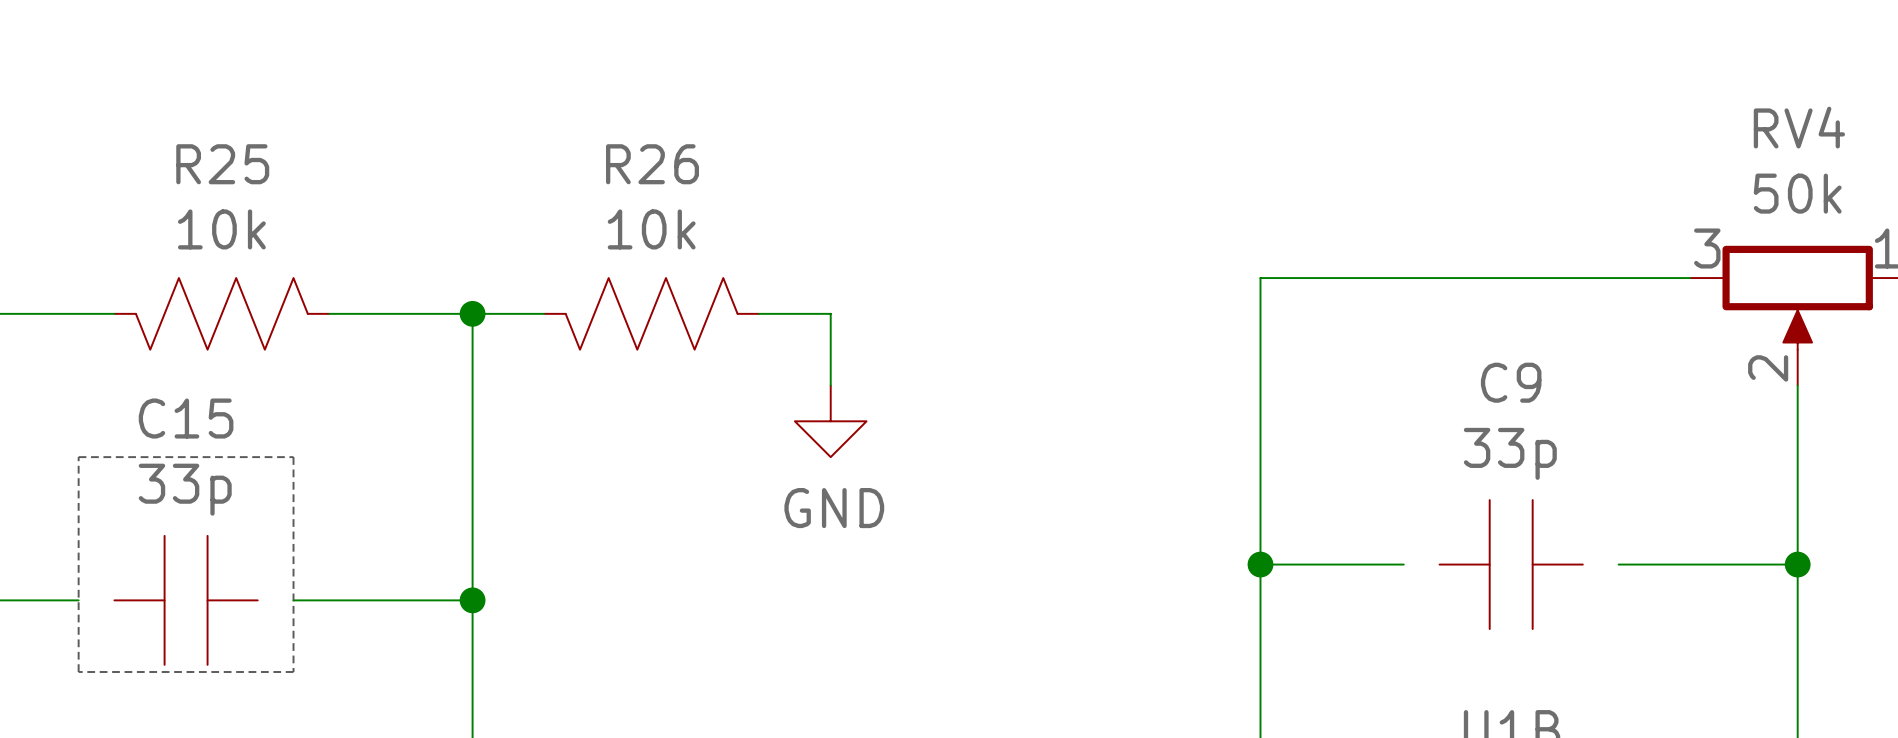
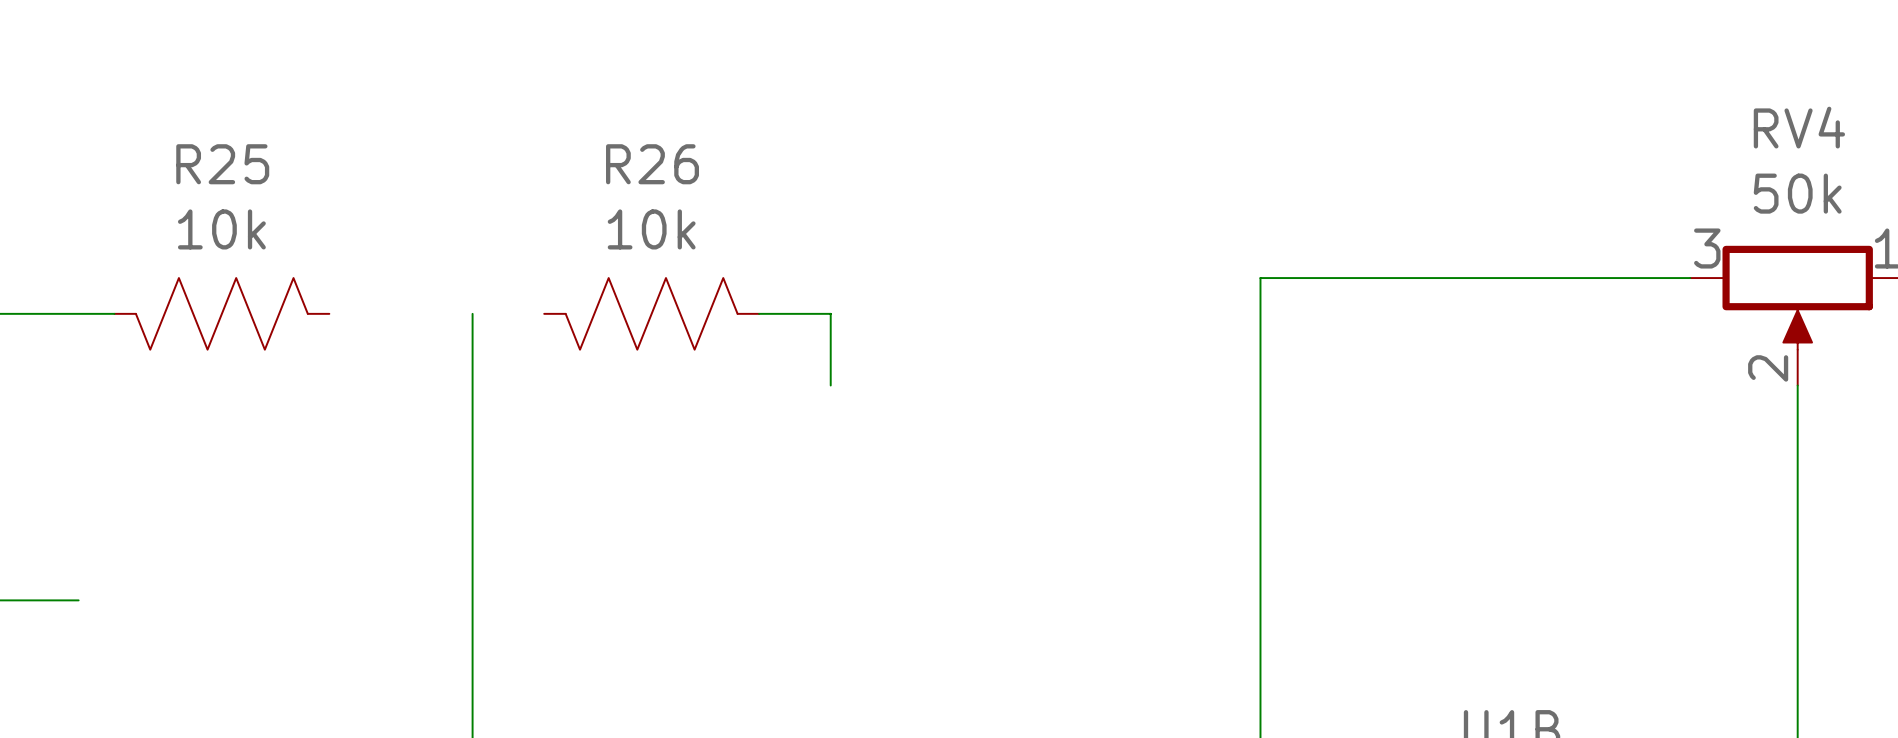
wire: (329, 313) (544, 313) -> none
junction: (472, 313) -> none
power symbol: GND (830, 421) -> none
line: (78, 457) (293, 457) (293, 672) (78, 672) (78, 457) -> none
wire: (1260, 564) (1403, 564) -> none
junction: (1260, 564) -> none
C9: 33p (1511, 564) -> none
wire: (1618, 564) (1797, 564) -> none
junction: (1797, 564) -> none
C15: 33p (186, 600) -> none
wire: (293, 600) (472, 600) -> none
junction: (472, 600) -> none

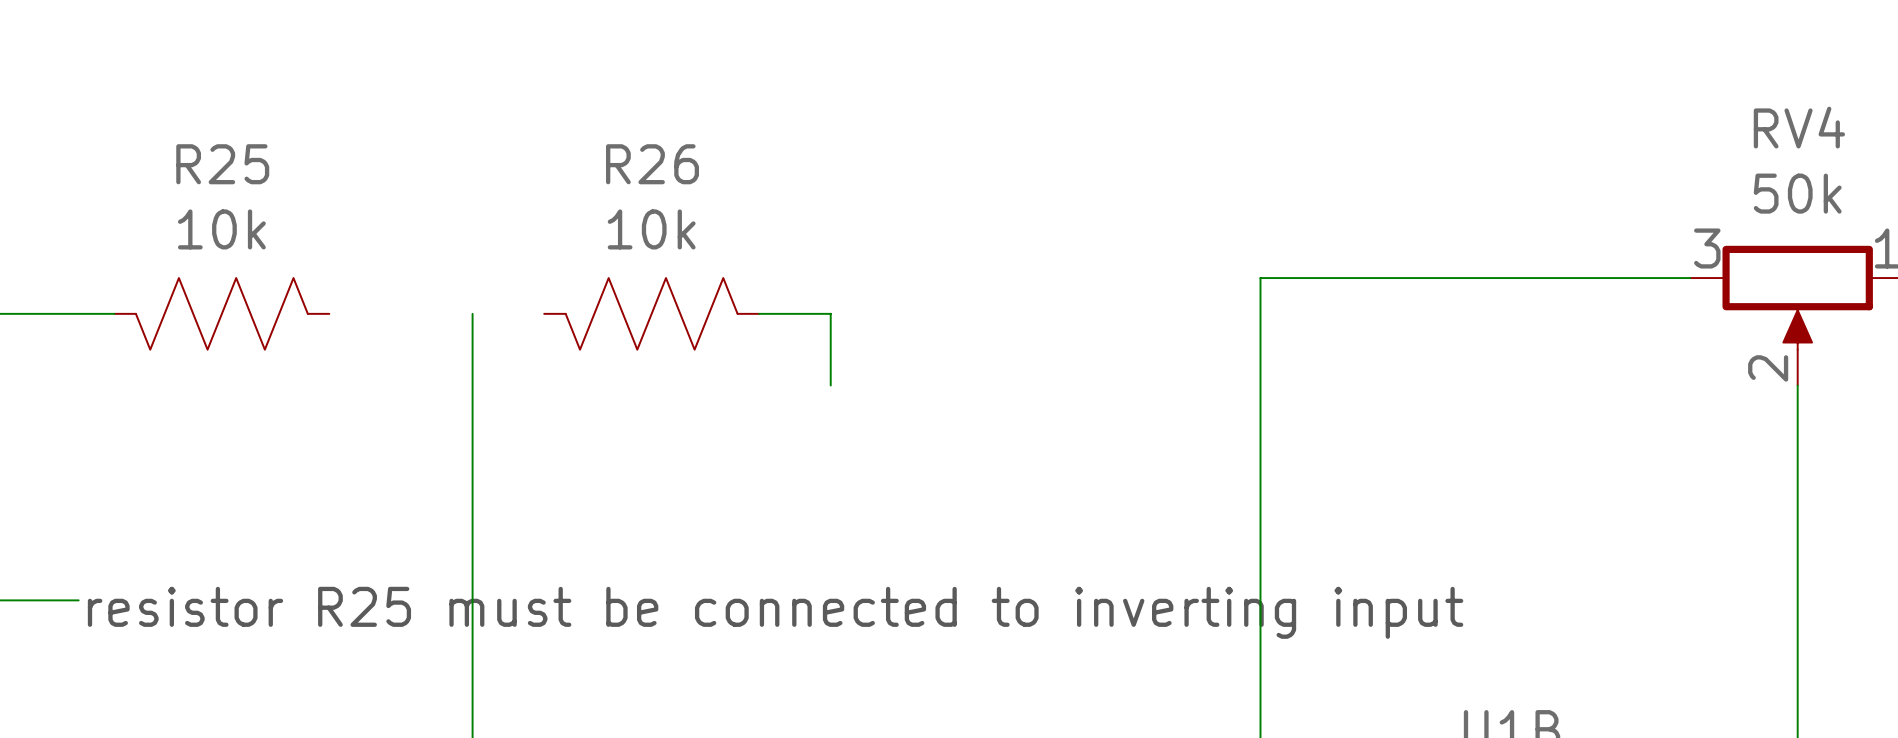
text: none -> resistor R25 must be connected to inverting input (775, 612)

